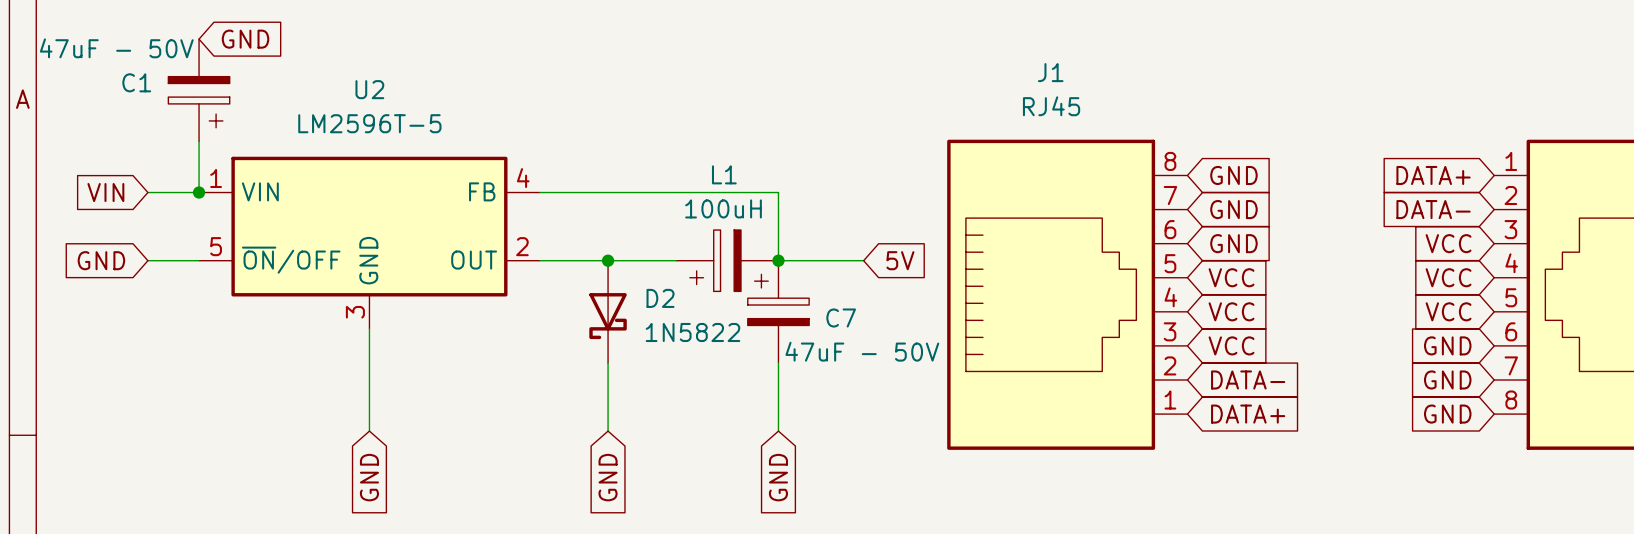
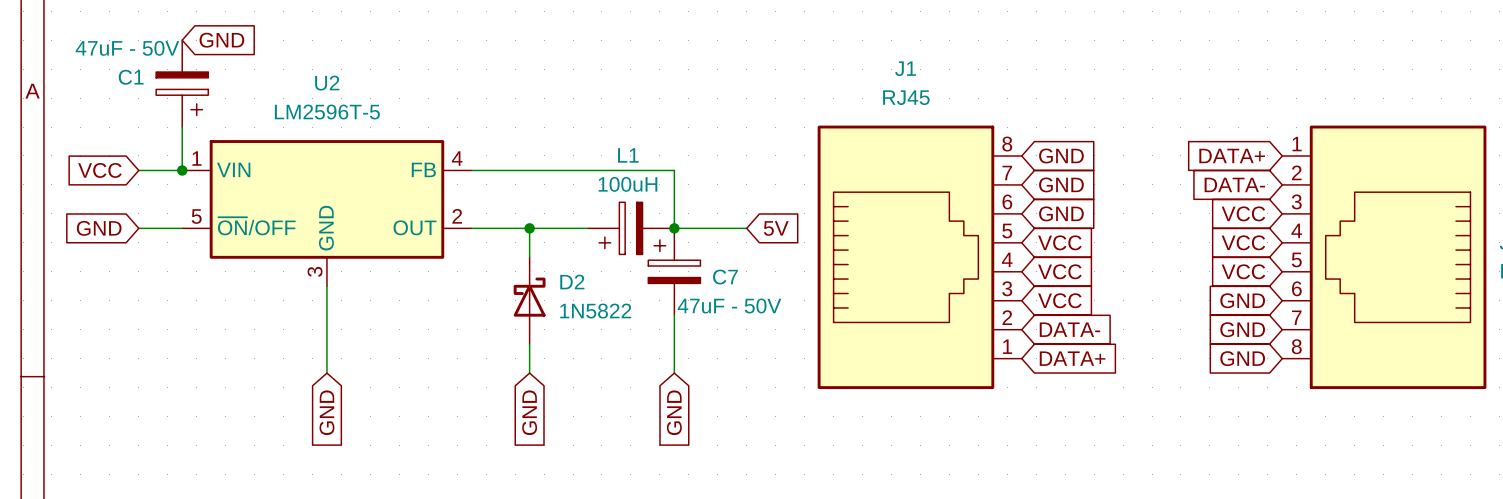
global label: VIN (105, 192) -> VCC (99, 170)
D2 rotation: 0° (608, 316) -> 180° (529, 297)

